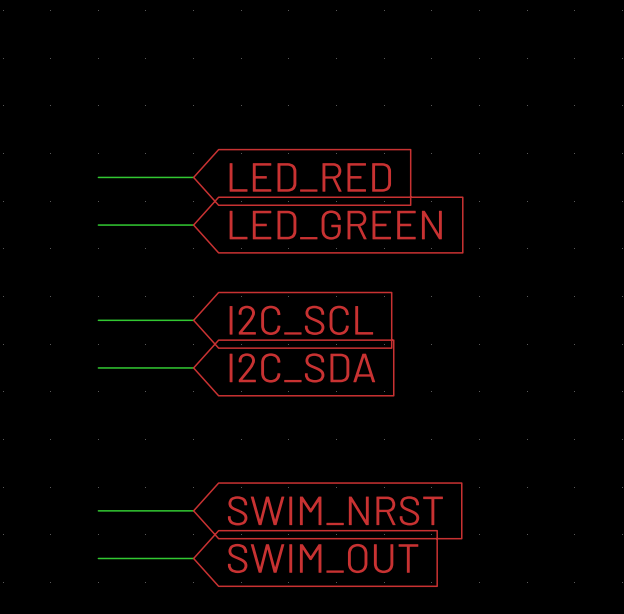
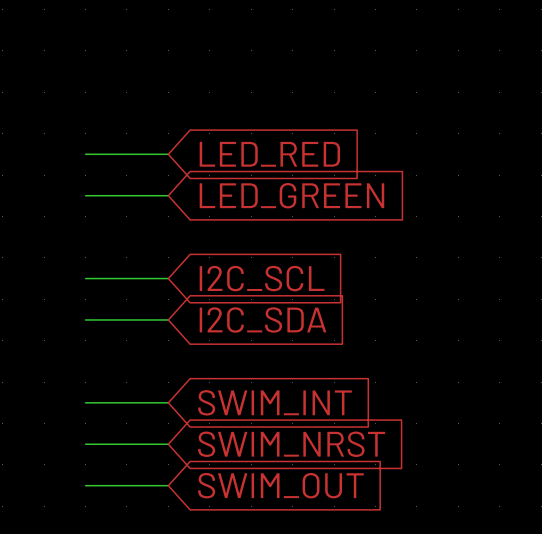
wire: none -> (85, 402) (168, 402)
global label: none -> SWIM_INT (275, 402)

